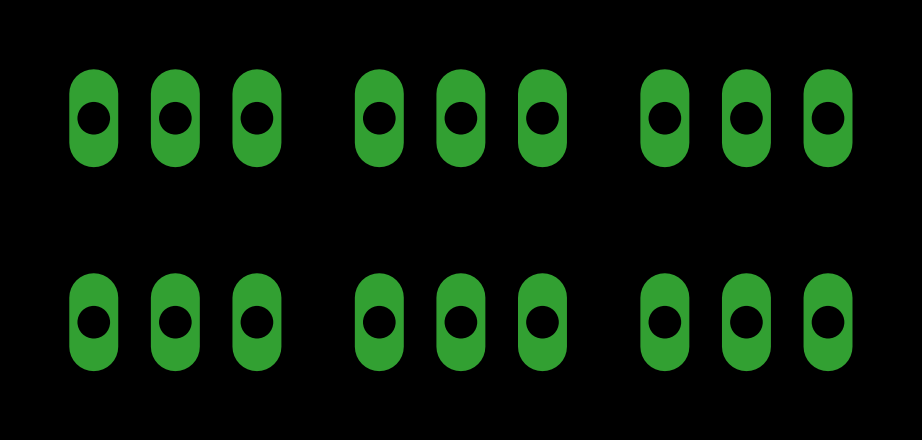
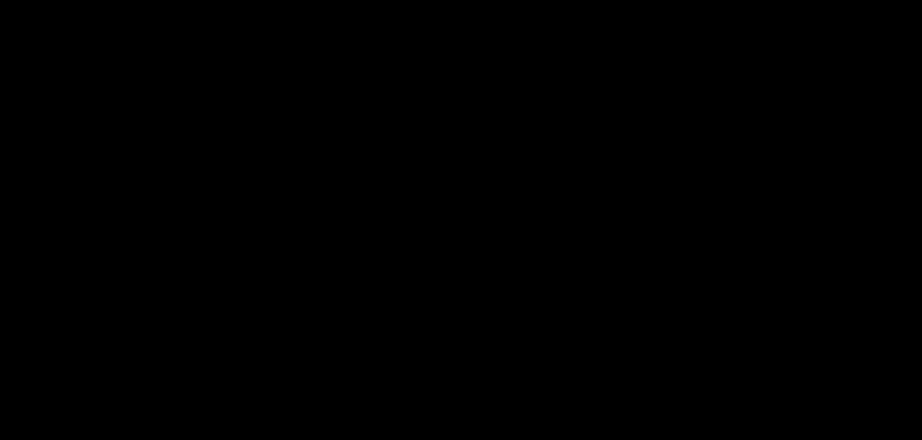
part: (175, 118) -> none
part: (460, 118) -> none
part: (746, 118) -> none
part: (175, 322) -> none
part: (460, 322) -> none
part: (746, 322) -> none

